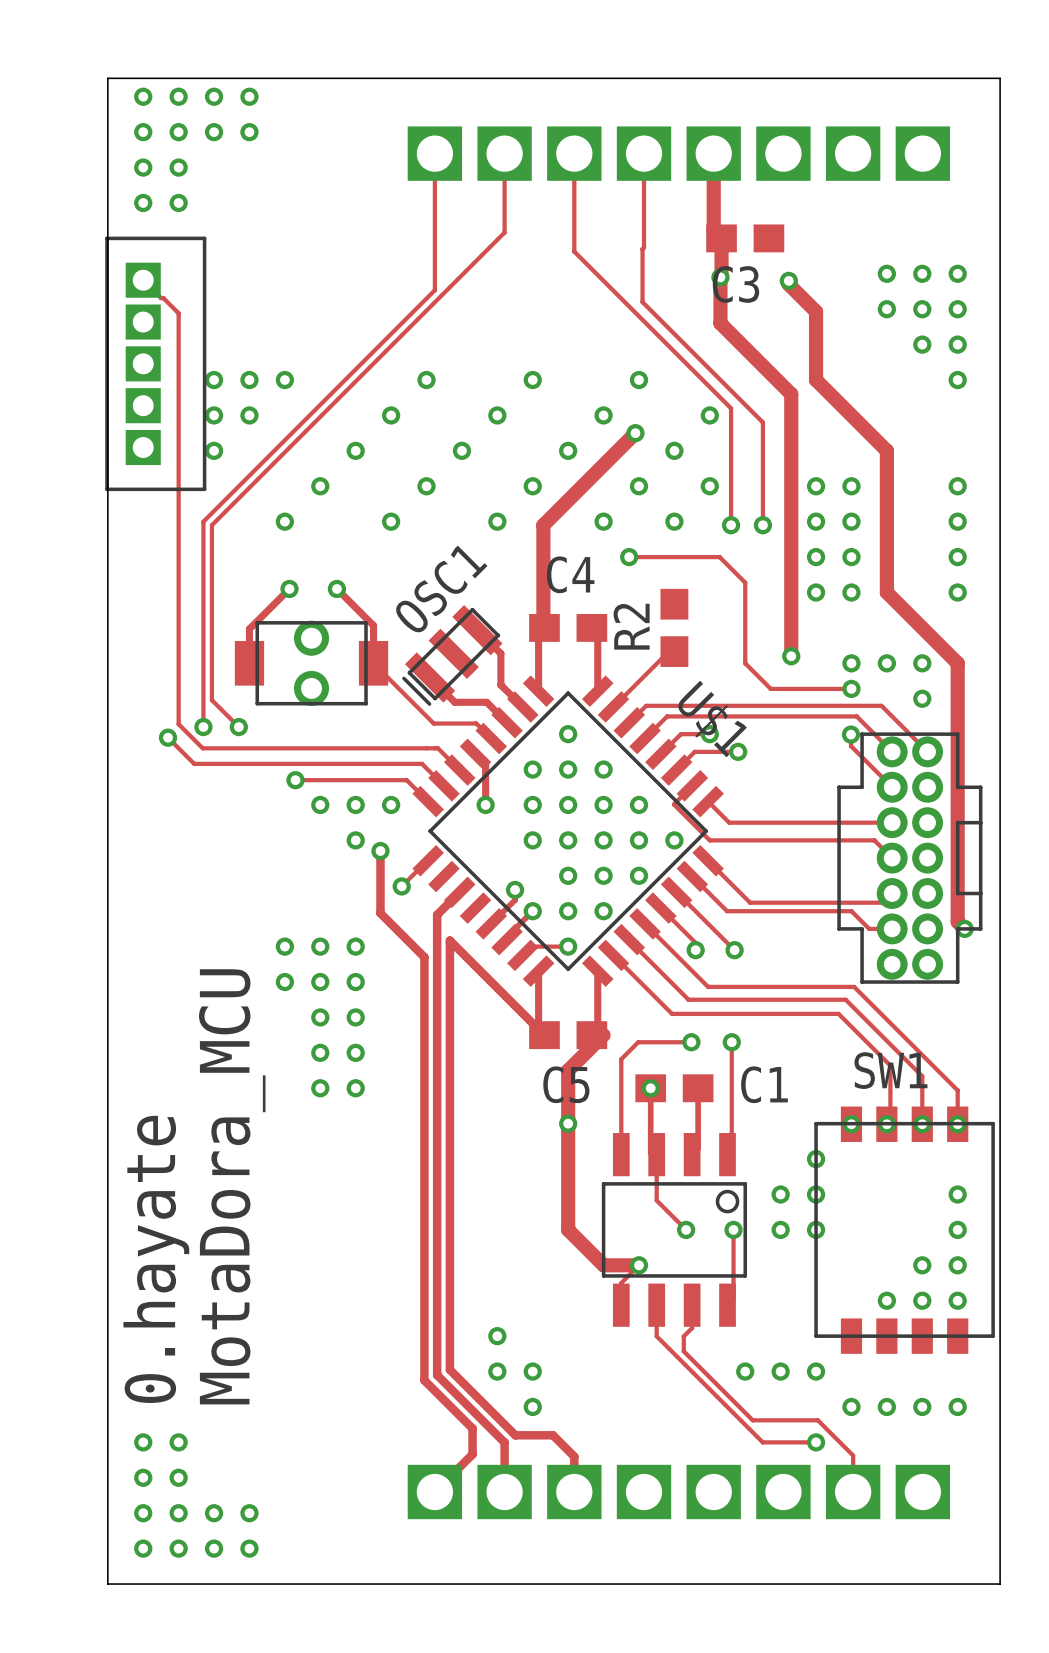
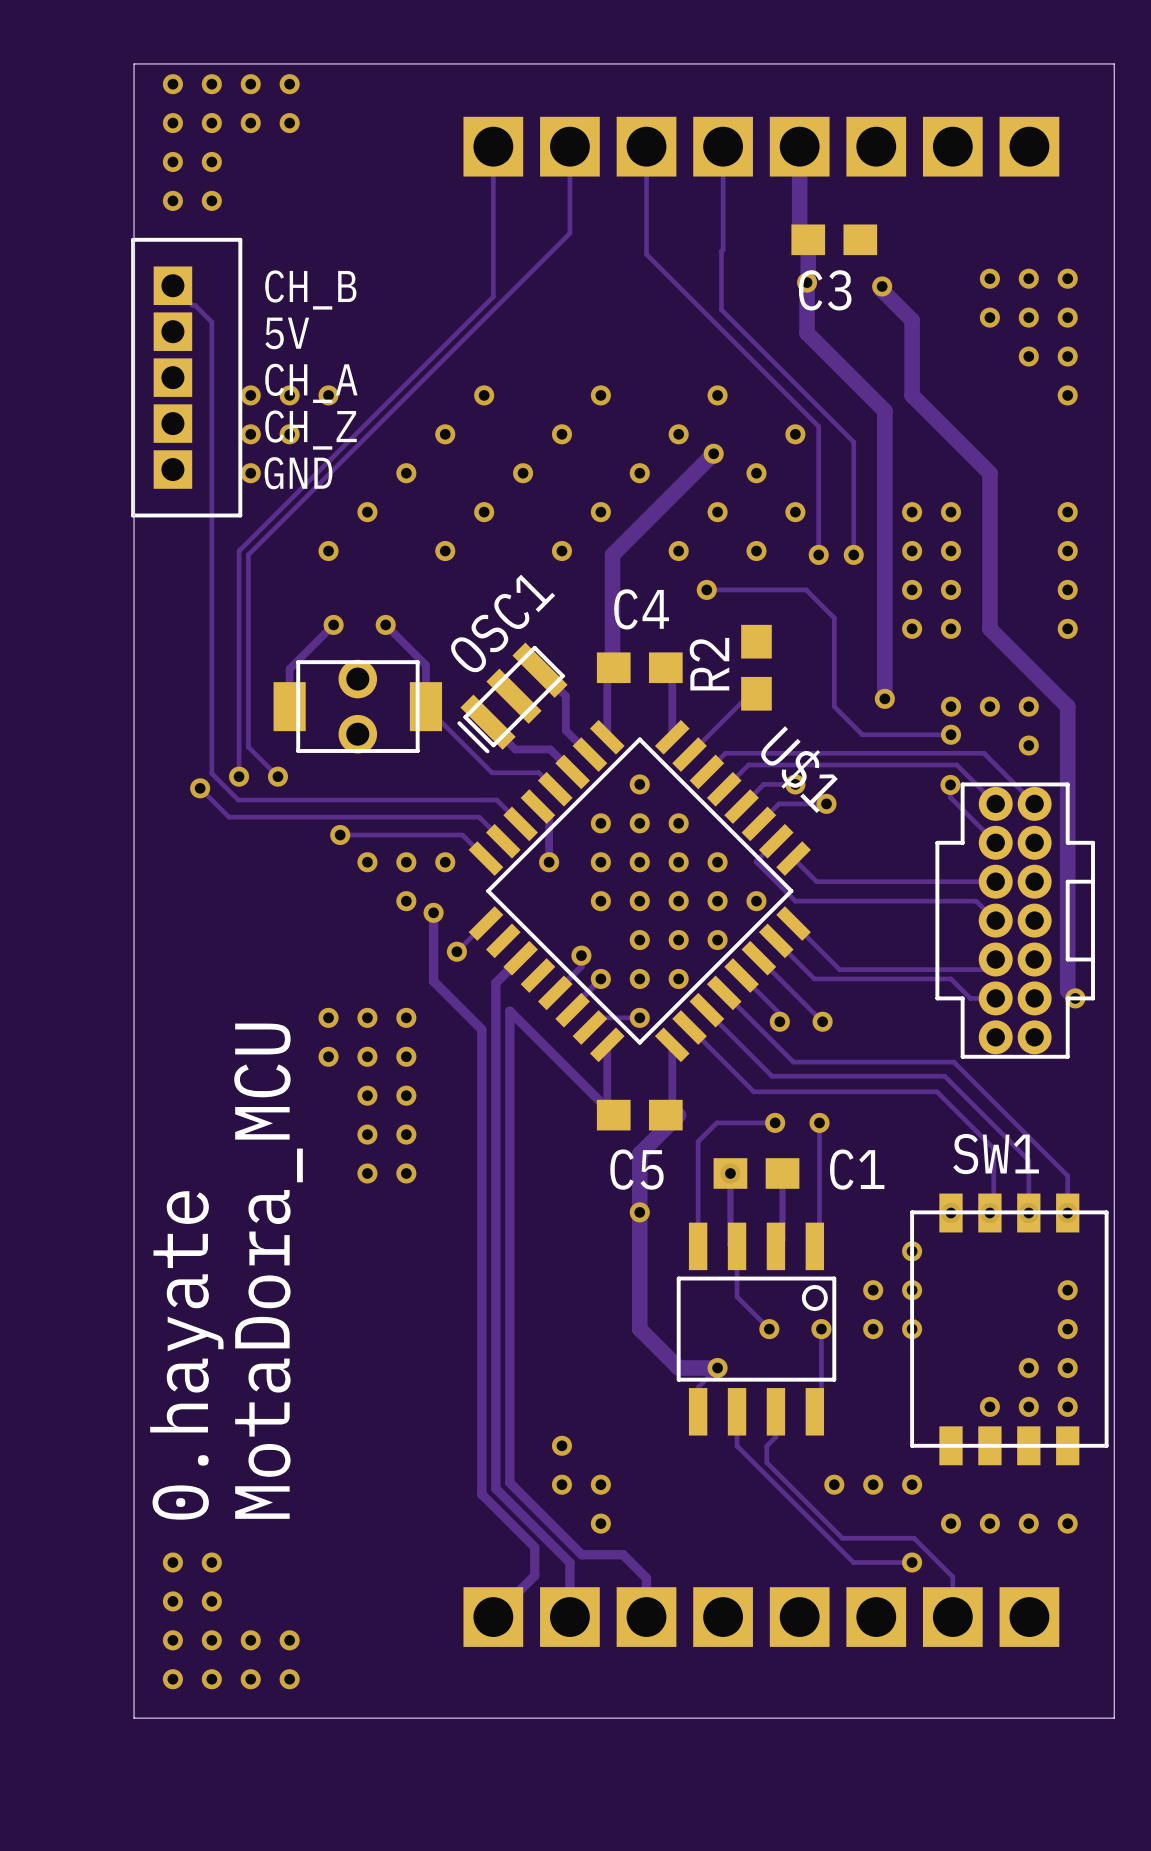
text: none -> CH_B (310, 289)
text: none -> 5V (287, 333)
text: none -> CH_A (311, 383)
text: none -> CH_Z (311, 430)
text: none -> GND (298, 473)

